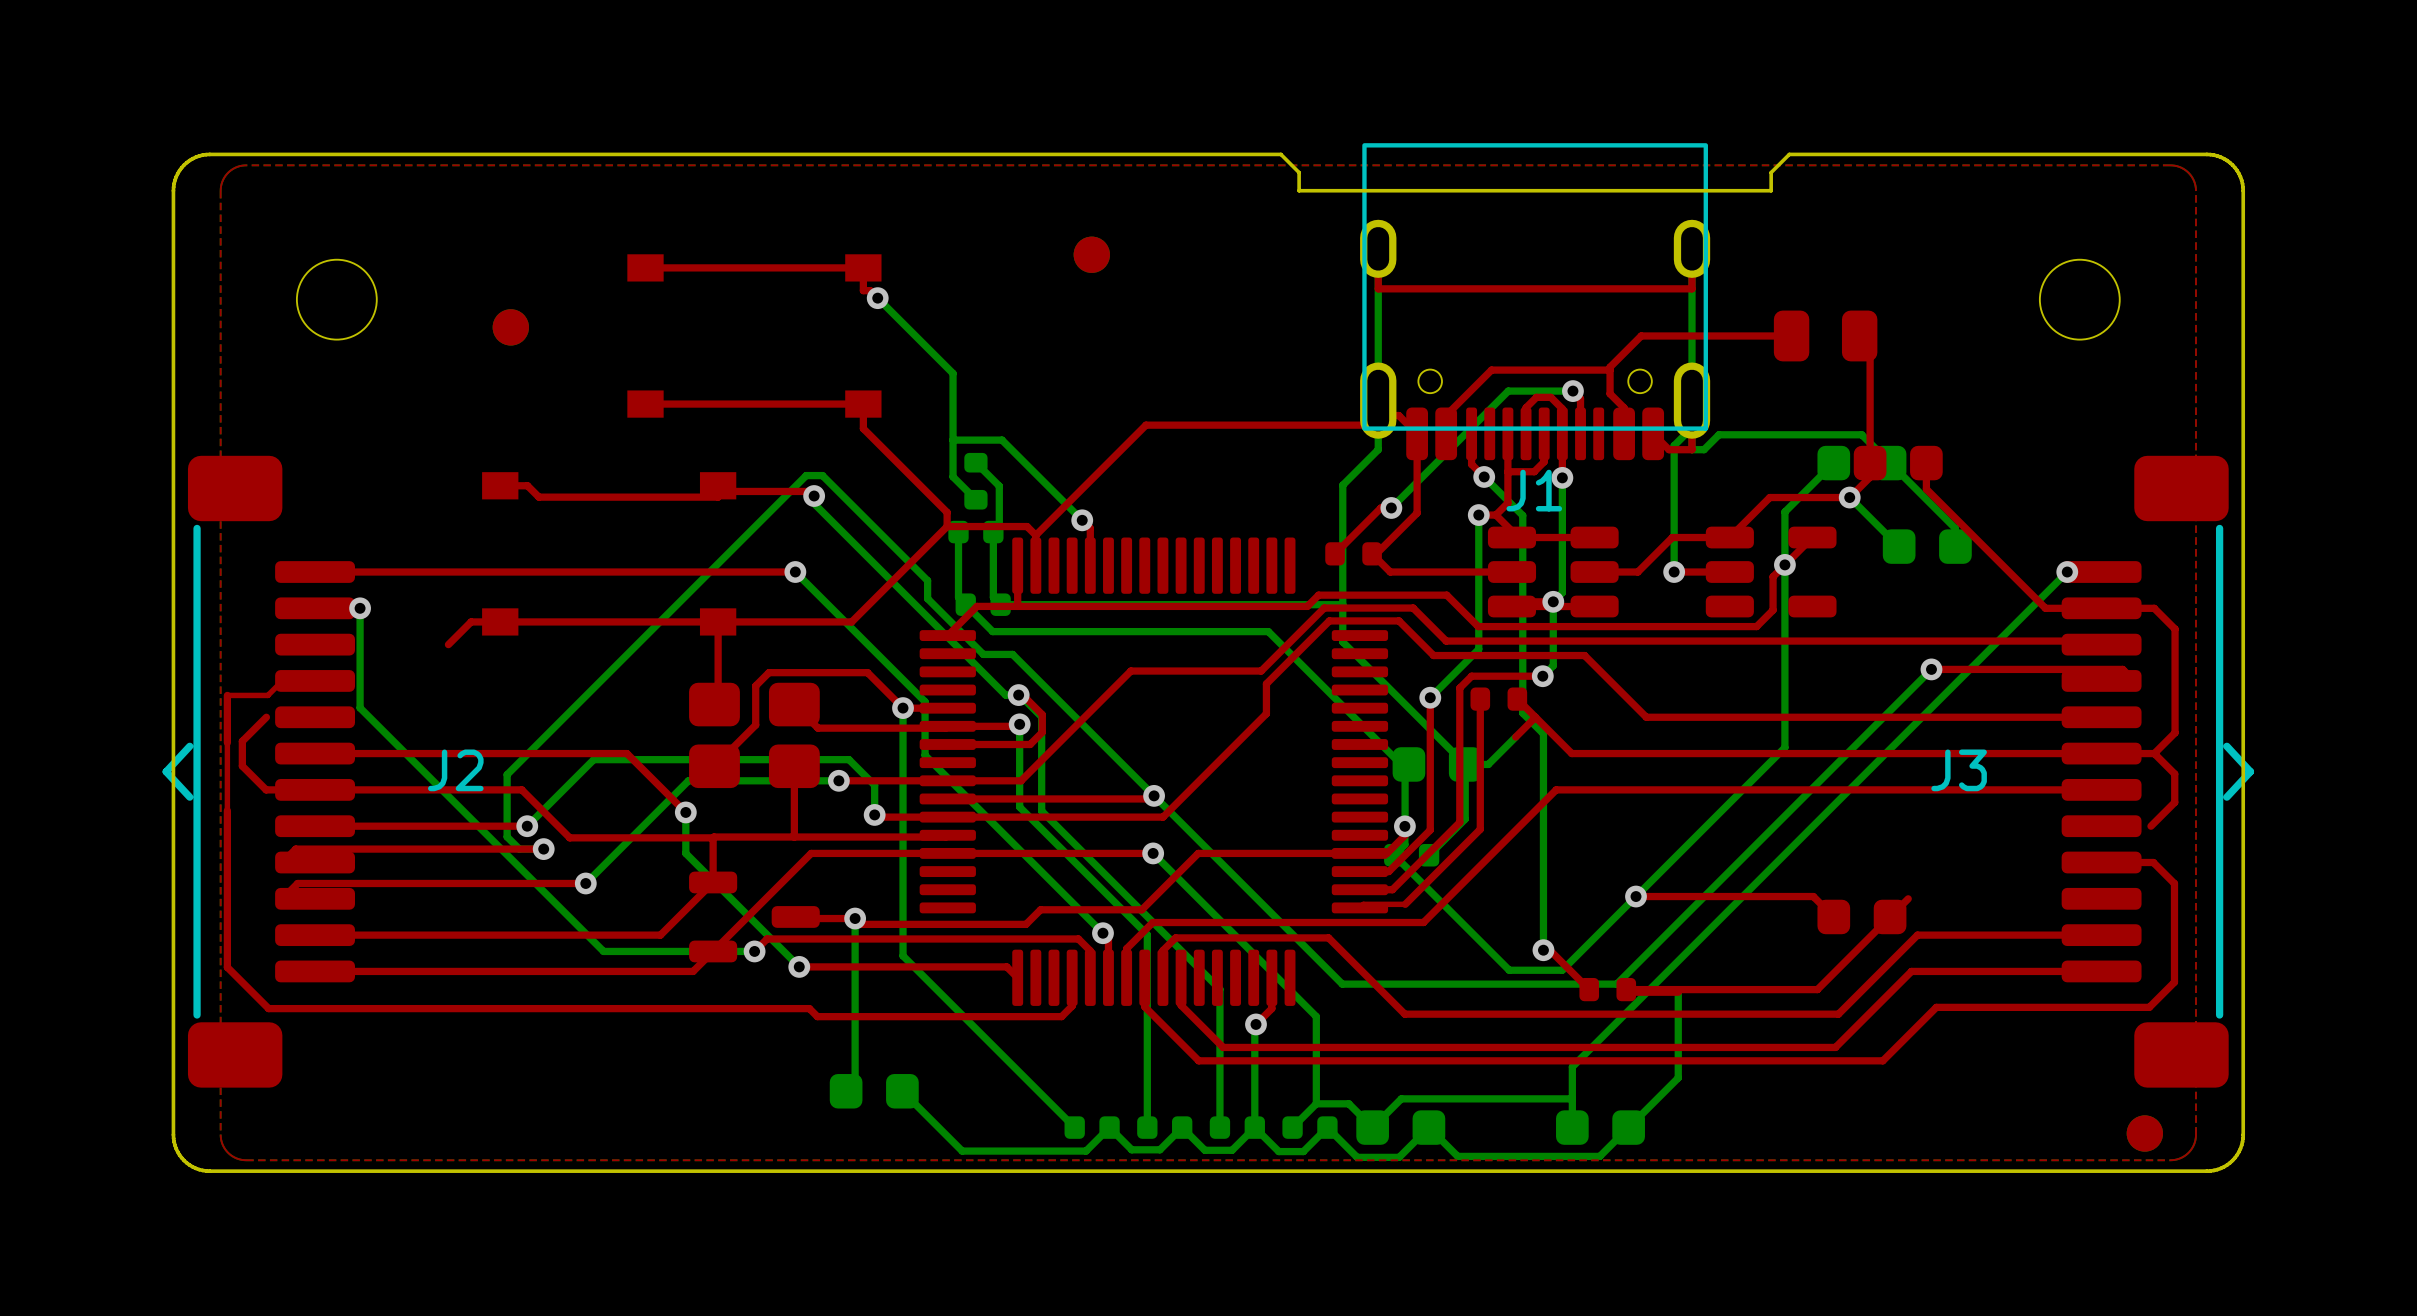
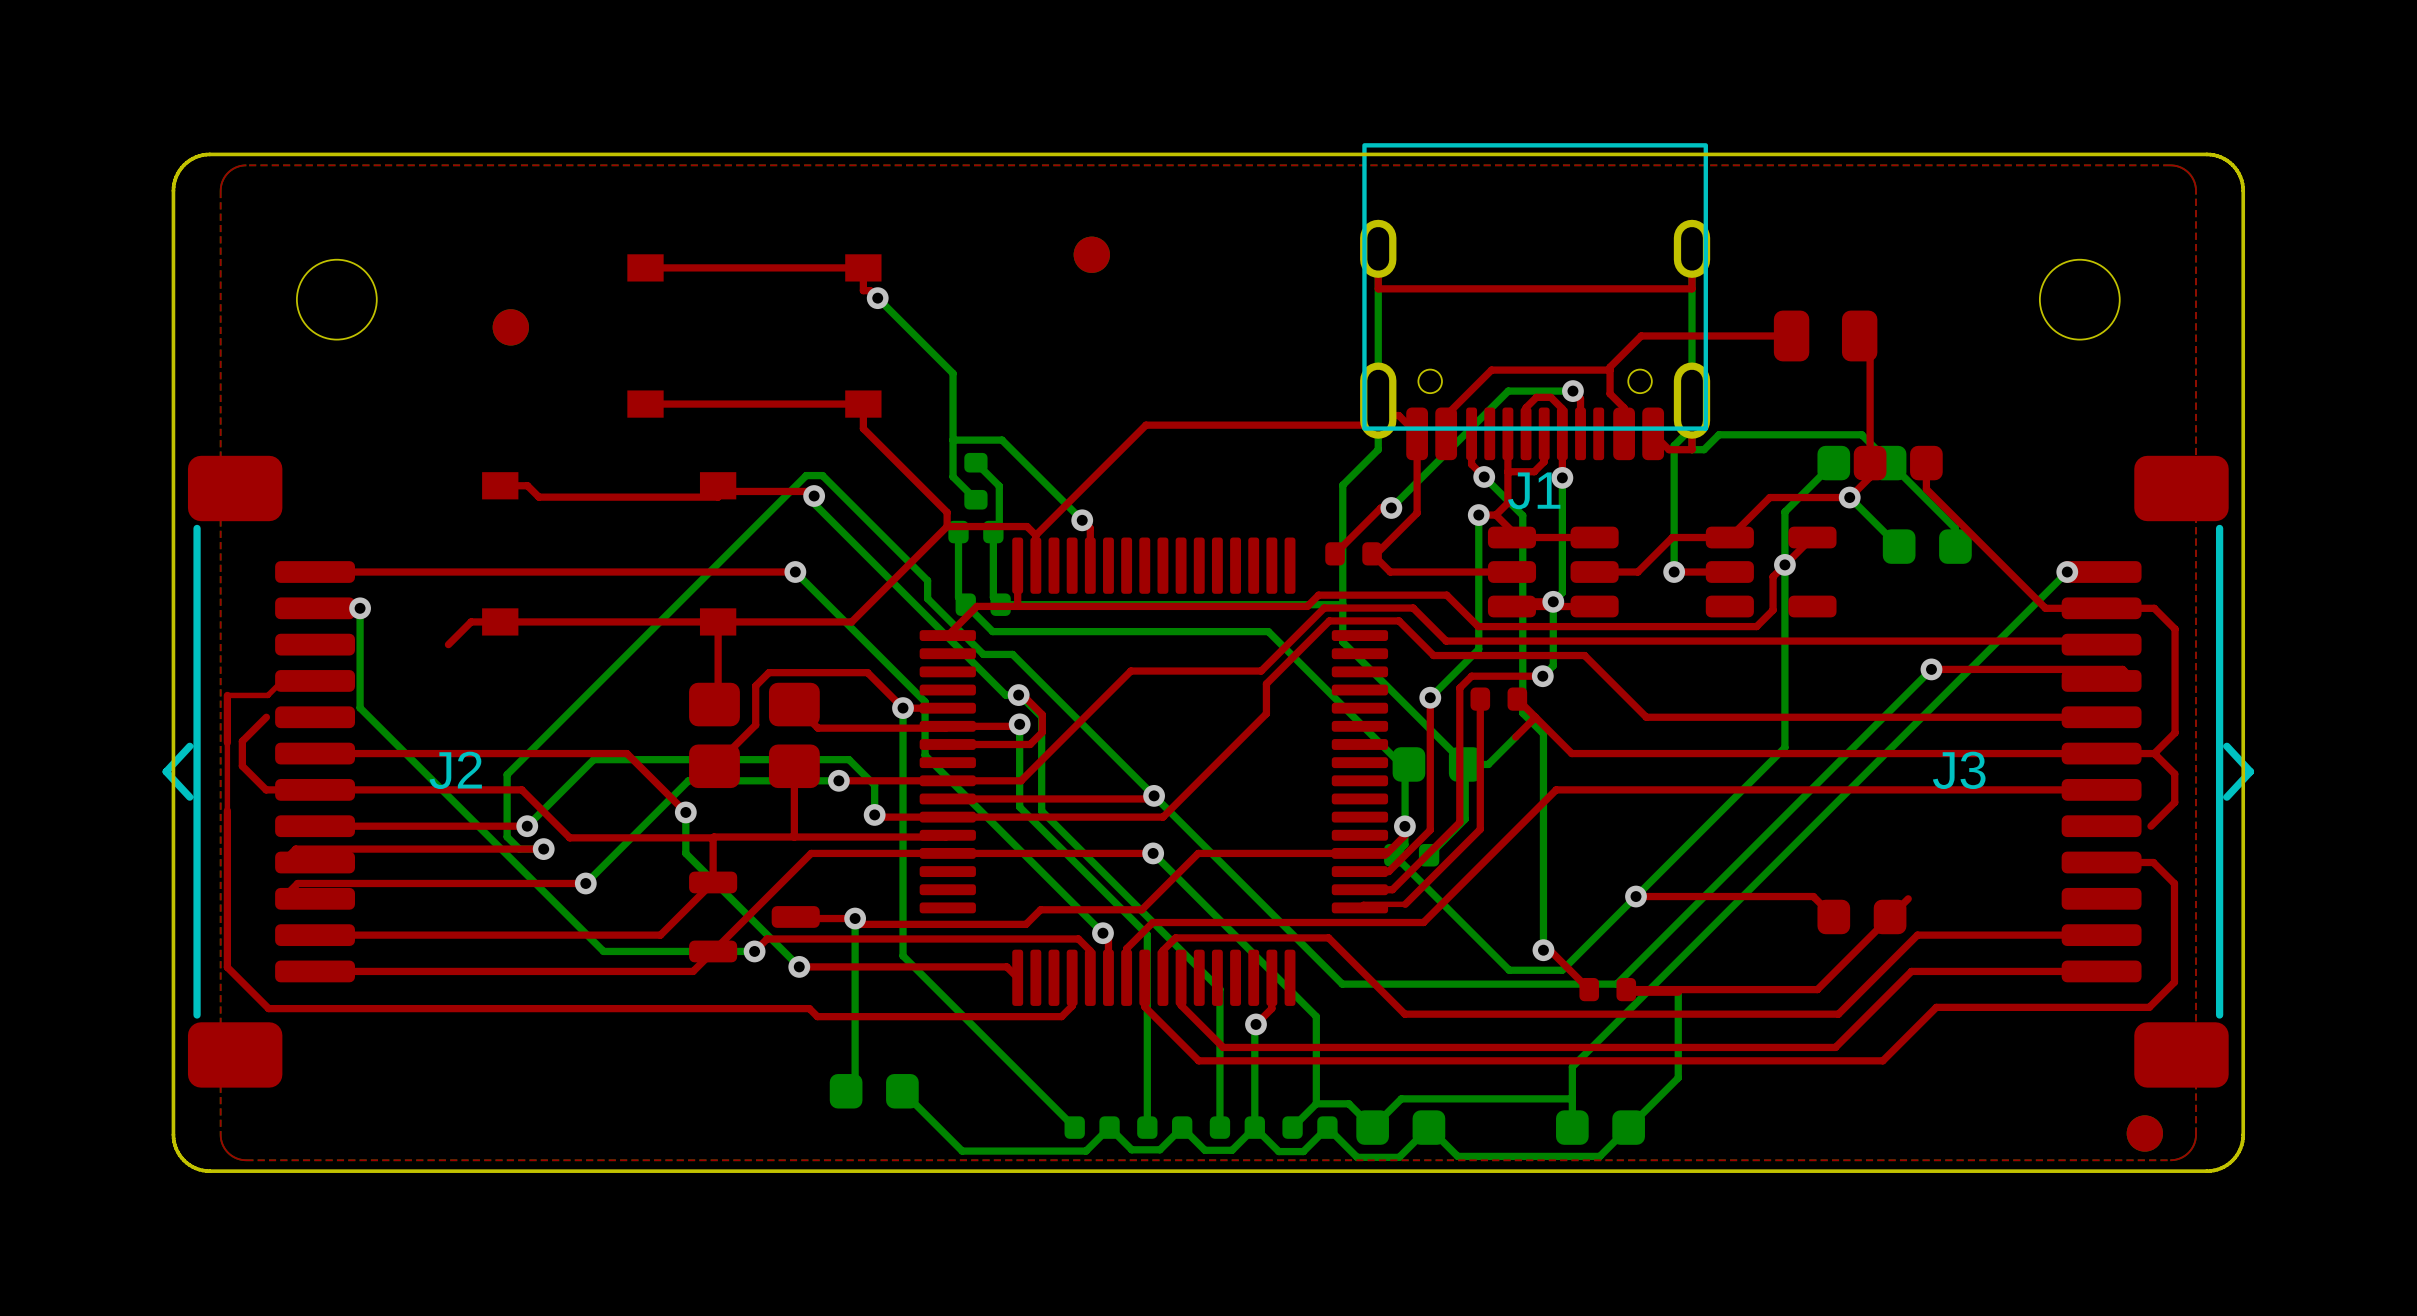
board edge: (1280, 154) (1299, 172) (1299, 190) (1771, 190) (1771, 172) (1789, 154) -> (1280, 154) (1789, 154)

